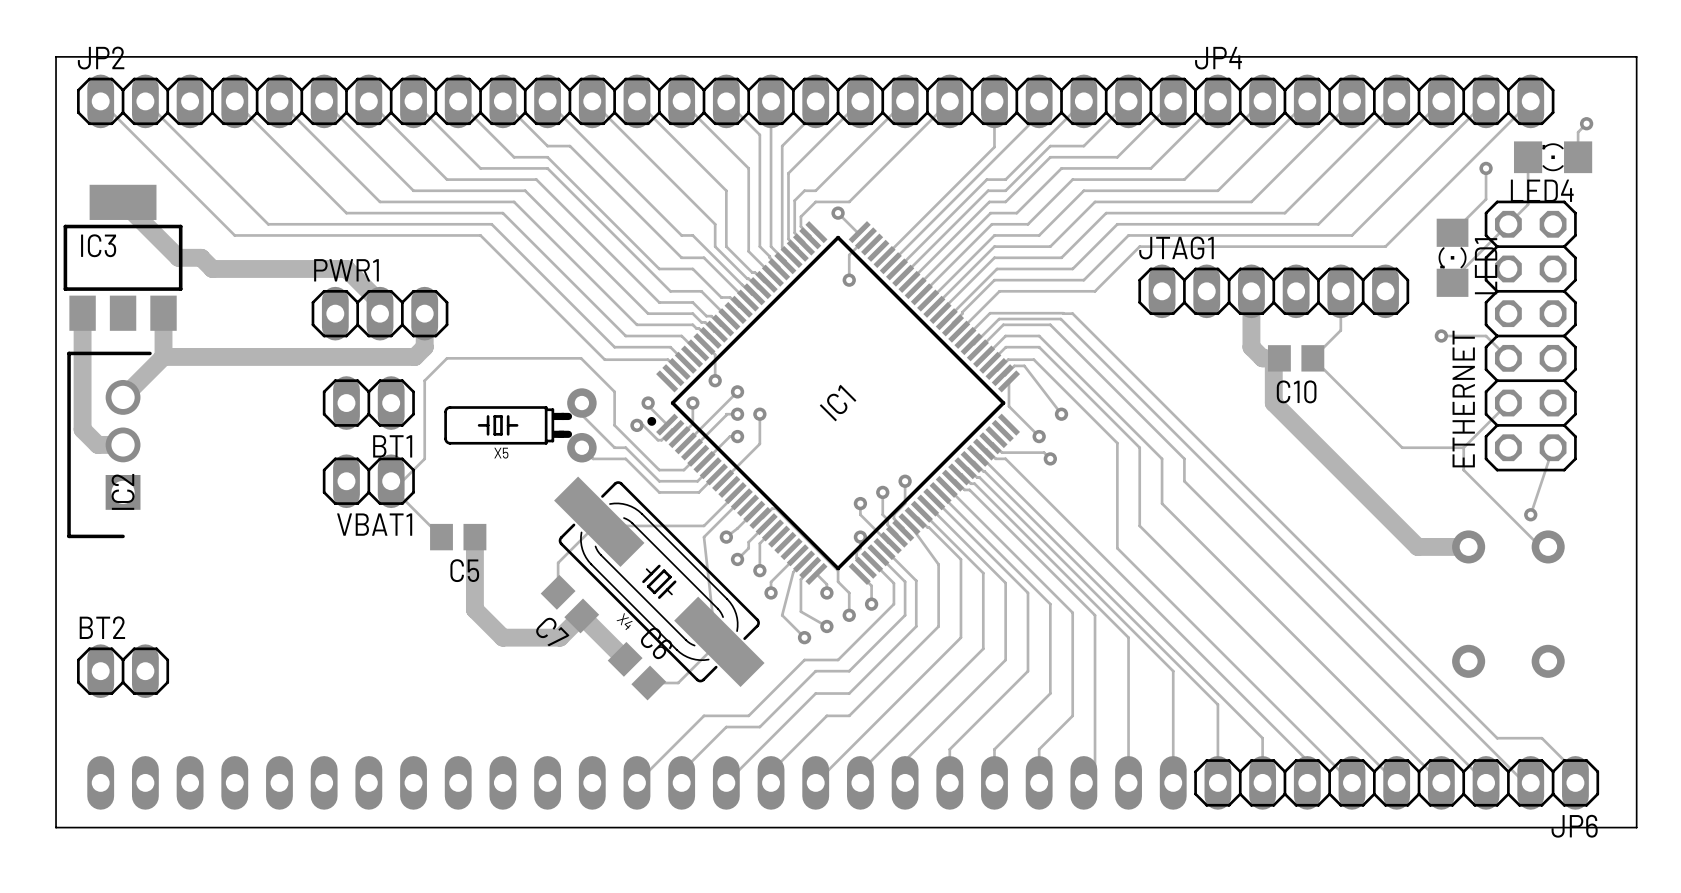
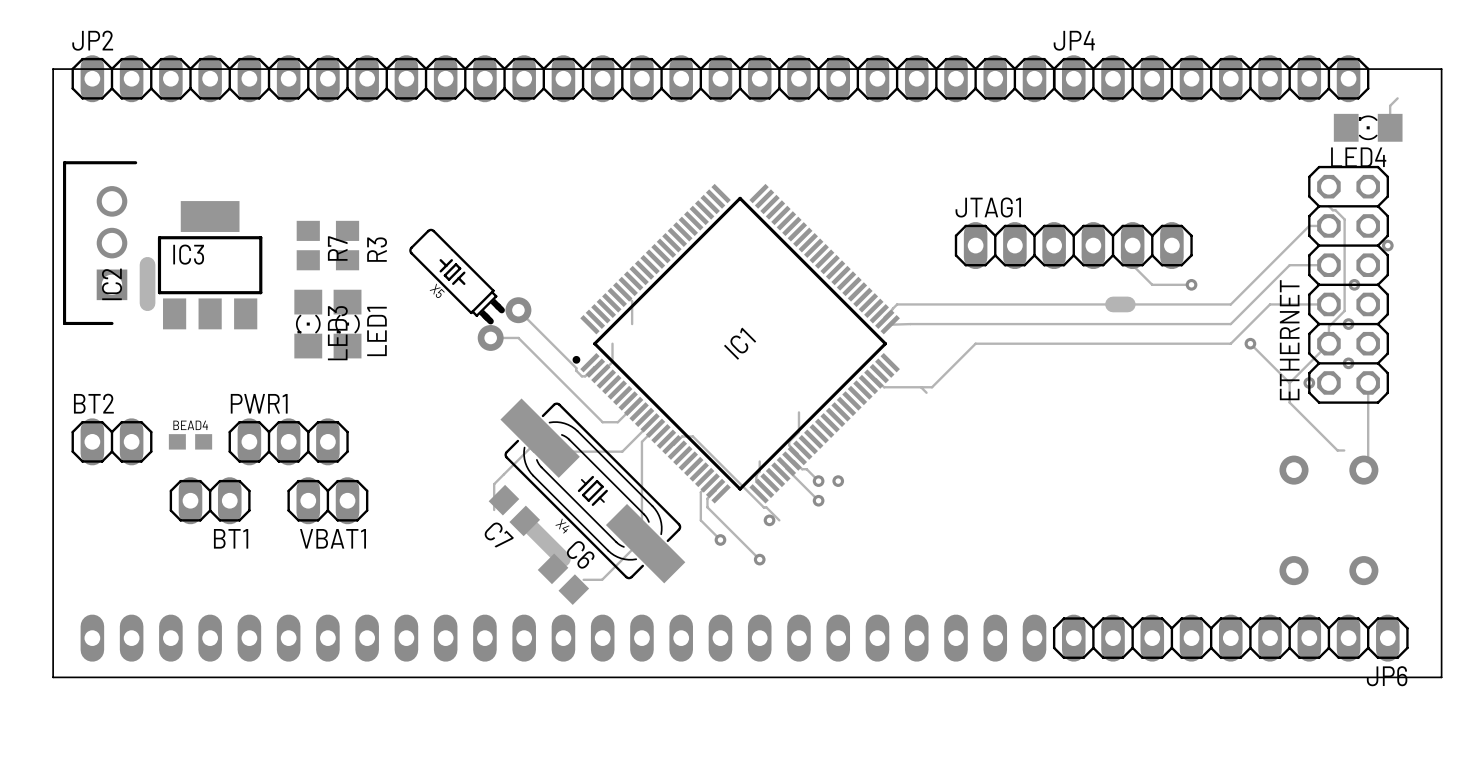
board edge: (56, 90) (56, 56) (1636, 56) (1636, 90) -> (53, 69) (1441, 69)
track: (100, 101) (234, 235) (480, 235) (604, 359) (667, 359) (679, 368) -> none
track: (145, 101) (268, 224) (491, 224) (614, 347) (670, 347) (685, 362) -> none
track: (234, 101) (346, 213) (502, 213) (625, 336) (681, 336) (698, 350) -> none
track: (279, 101) (380, 201) (514, 201) (636, 324) (692, 324) (710, 337) -> none
track: (324, 101) (413, 190) (525, 190) (648, 313) (692, 313) (701, 322) (705, 322) (716, 331) -> none
track: (368, 101) (447, 179) (536, 179) (659, 302) (692, 302) (706, 316) (711, 316) (723, 325) -> none
track: (413, 101) (480, 168) (547, 168) (670, 291) (701, 291) (729, 319) -> none
track: (458, 101) (514, 157) (547, 157) (659, 268) (692, 268) (721, 297) (730, 297) (741, 306) -> none
track: (502, 101) (547, 146) (569, 146) (681, 257) (704, 257) (748, 300) -> none
track: (547, 101) (681, 235) (692, 235) (751, 294) (754, 294) -> none
track: (592, 101) (715, 224) (715, 246) (747, 278) (760, 288) -> none
track: (636, 101) (726, 190) (726, 246) (752, 272) (766, 281) -> none
track: (681, 101) (748, 168) (748, 251) (772, 275) -> none
track: (726, 101) (759, 134) (759, 246) (779, 267) (779, 269) -> none
track: (771, 101) (771, 246) (785, 263) -> none
track: (815, 101) (815, 112) (782, 146) (782, 247) (791, 257) -> none
track: (860, 101) (788, 173) (788, 239) (797, 250) -> none
track: (905, 101) (815, 190) (804, 190) (794, 200) (794, 232) (804, 244) -> none
track: (949, 101) (849, 201) (815, 201) (800, 216) (800, 226) (810, 238) -> none
track: (994, 101) (994, 147) (884, 257) -> none
track: (1039, 101) (1039, 114) (890, 263) -> none
track: (1083, 101) (1005, 179) (986, 179) (897, 269) -> none
track: (1128, 101) (1083, 146) (1050, 146) (1005, 190) (988, 190) (903, 275) -> none
track: (1173, 101) (1117, 157) (1050, 157) (1005, 201) (989, 201) (909, 281) -> none
track: (1217, 101) (1150, 168) (1061, 168) (1016, 213) (990, 213) (915, 288) -> none
track: (1262, 101) (1184, 179) (1072, 179) (1027, 224) (991, 224) (921, 294) -> none
track: (1307, 101) (1217, 190) (1083, 190) (1039, 235) (994, 235) (928, 300) -> none
track: (1351, 101) (1251, 201) (1095, 201) (1050, 246) (994, 246) (934, 306) -> none
track: (1396, 101) (1284, 213) (1106, 213) (1061, 257) (994, 257) (940, 312) -> none
track: (1441, 101) (1318, 224) (1117, 224) (1072, 268) (997, 268) (946, 319) -> none
track: (1486, 101) (1351, 235) (1128, 235) (1083, 280) (994, 280) (962, 312) (953, 325) -> none
track: (1530, 101) (1385, 246) (1139, 246) (1095, 291) (999, 291) (959, 331) -> none
via: (1586, 123) -> none
track: (1528, 157) (1528, 204) (1452, 280) (1452, 282) -> none
track: (1486, 168) (1486, 199) (1452, 232) -> none
via: (1486, 168) -> none
track: (123, 202) (178, 257) (201, 257) (212, 268) (346, 268) (380, 302) (380, 313) -> none
track: (838, 213) (857, 232) (859, 232) -> none
via: (838, 213) -> none
track: (865, 238) (849, 255) (849, 280) -> none
track: none -> (1328, 206) (1344, 219) (1344, 310) (1328, 326) (1328, 343)
IC3 position: (123, 257) -> (210, 265)
LED1 position: (1452, 257) -> (347, 324)
via: (849, 280) -> none
R7: none -> (308, 245)
R3: none -> (347, 245)
track: (1251, 291) (1251, 347) (1262, 358) -> none
JTAG1 position: (1273, 291) -> (1073, 245)
track: none -> (1132, 245) (1132, 265) (1152, 284) (1191, 284)
track: (1340, 291) (1340, 330) (1312, 358) (1402, 447) (1463, 447) -> (1250, 343) (1289, 382)
via: none -> (1387, 245)
track: (82, 313) (82, 429) (97, 444) (123, 444) -> none
PWR1 position: (380, 313) -> (288, 441)
track: (424, 313) (424, 347) (414, 356) (163, 356) (123, 397) -> none
via: none -> (1191, 284)
track: (1441, 336) (1486, 336) (1508, 358) -> (921, 387) (932, 387) (975, 343) (1230, 343) (1270, 304) (1328, 304)
via: (1441, 336) -> none
via: none -> (1354, 284)
track: (965, 337) (990, 313) (1072, 313) (1497, 738) (1541, 738) (1575, 771) (1575, 782) -> none
track: (971, 344) (974, 344) (999, 319) (1060, 319) (1524, 782) (1530, 782) -> none
track: (977, 350) (1003, 324) (1050, 324) (1184, 458) (1184, 481) (1486, 782) -> none
track: (984, 356) (1005, 336) (1039, 336) (1162, 458) (1162, 503) (1441, 782) -> none
track: (1279, 358) (1273, 363) (1273, 403) (1417, 546) (1468, 546) -> (1127, 304) (1230, 304) (1309, 225) (1328, 225)
C10: (1296, 358) -> none
track: (990, 362) (1005, 347) (1039, 347) (1139, 447) (1139, 525) (1396, 782) -> none
track: (996, 368) (997, 370) (1008, 359) (1033, 359) (1117, 443) (1117, 548) (1351, 782) -> none
track: (1002, 375) (1014, 365) (1024, 365) (1061, 414) -> (884, 319) (897, 304) (1113, 304)
LED3: none -> (308, 324)
via: (715, 380) -> none
via: none -> (1348, 324)
track: (1008, 381) (1008, 406) (1039, 436) -> (890, 324) (1230, 324) (1289, 265) (1328, 265)
track: (737, 391) (686, 443) -> none
via: (737, 391) -> none
BT1 position: (368, 403) -> (210, 500)
track: (581, 403) (581, 415) (614, 447) (625, 447) (659, 481) (697, 481) (710, 468) -> none
track: (648, 403) (648, 405) (667, 424) -> none
via: (648, 403) -> none
via: (692, 403) -> none
via: none -> (1250, 343)
track: (737, 414) (726, 414) (692, 449) -> none
via: (737, 414) -> none
track: (759, 414) (759, 443) (723, 480) -> none
via: (759, 414) -> none
via: (1061, 414) -> none
X5 rotation: 0° (520, 425) -> 45° clockwise (470, 289)
track: (614, 425) (614, 391) (581, 358) (447, 358) (424, 380) (424, 458) (402, 481) (391, 481) (391, 486) (441, 537) -> (543, 363) (518, 337) (490, 337)
track: (636, 425) (643, 425) (651, 433) -> (518, 310) (576, 368) (576, 370)
via: (636, 425) -> none
via: none -> (1348, 363)
track: (737, 436) (729, 436) (704, 461) -> none
via: (737, 436) -> none
via: (1039, 436) -> none
IC2 position: (109, 444) -> (100, 243)
track: (581, 447) (593, 458) (625, 458) (659, 492) (681, 492) -> none
via: none -> (1309, 382)
track: (1553, 447) (1530, 514) -> (1368, 382) (1368, 481)
track: (984, 449) (995, 458) (1005, 458) (1307, 760) (1307, 782) -> none
track: (698, 455) (683, 470) (659, 470) -> (602, 422) (583, 402)
track: (977, 455) (980, 455) (1262, 738) (1262, 782) -> none
via: (1050, 458) -> none
track: (971, 461) (984, 471) (1217, 704) (1217, 782) -> none
track: (965, 468) (979, 477) (1173, 671) (1173, 782) -> none
track: (959, 474) (970, 483) (974, 483) (1128, 637) (1128, 782) -> none
track: (953, 480) (964, 489) (969, 489) (1095, 615) (1095, 771) (1083, 782) -> none
VBAT1 position: (368, 481) -> (327, 500)
via: (905, 481) -> none
track: (946, 486) (1072, 612) (1072, 715) (1039, 749) (1039, 782) -> none
track: (882, 492) (882, 514) (897, 536) -> (818, 481) (806, 469) (802, 469) (791, 461)
via: (882, 492) -> none
track: (940, 493) (1050, 604) (1050, 693) (994, 749) (994, 782) -> none
track: (934, 499) (1027, 592) (1027, 671) (949, 749) (949, 782) -> none
track: (860, 503) (860, 514) (888, 542) (890, 542) -> (818, 500) (786, 466)
via: (860, 503) -> none
track: (928, 505) (1005, 583) (1005, 660) (905, 760) (905, 782) -> none
track: (776, 508) (838, 570) (838, 581) (849, 592) (849, 615) -> (685, 436) (692, 436) (763, 507) (766, 507) (779, 520)
track: (754, 511) (726, 537) -> none
track: (921, 511) (983, 573) (983, 648) (860, 771) (860, 782) -> none
BEAD4: none -> (190, 441)
track: (726, 514) (704, 537) (715, 637) (719, 641) (678, 682) (648, 682) -> (641, 441) (641, 539)
via: (1530, 514) -> none
track: (915, 517) (928, 527) (960, 559) (960, 637) (815, 782) -> none
track: (766, 524) (748, 542) (748, 548) (737, 559) -> none
track: (909, 524) (938, 564) (938, 626) (849, 715) (826, 715) (771, 771) (771, 782) -> none
track: (1518, 524) (1540, 546) (1548, 546) -> (1337, 450) (1344, 450)
track: (772, 530) (759, 543) (759, 570) -> none
C5: (458, 537) -> none
track: (474, 537) (474, 609) (502, 637) (560, 637) (581, 615) (625, 659) -> none
via: (726, 537) -> none
via: (860, 537) -> none
track: (884, 549) (916, 580) (916, 626) (849, 693) (815, 693) (726, 782) -> none
track: (797, 555) (771, 582) (771, 592) -> none
via: (737, 559) -> none
track: (882, 559) (905, 581) (905, 615) (849, 671) (815, 671) (759, 727) (726, 727) (681, 771) (681, 782) -> none
via: none -> (818, 481)
via: none -> (838, 481)
track: (872, 561) (893, 583) (893, 604) (838, 660) (804, 660) (748, 715) (704, 715) (636, 782) -> none
via: (759, 570) -> none
track: (793, 572) (782, 615) (804, 637) -> (700, 492) (700, 520) (720, 539)
track: (816, 573) (826, 584) (826, 592) -> none
track: (859, 573) (871, 585) (871, 604) -> none
X4 position: (659, 581) -> (592, 490)
via: none -> (818, 500)
track: (800, 589) (800, 611) (826, 626) -> (707, 507) (759, 559)
via: (771, 592) -> none
via: (826, 592) -> none
C7 position: (569, 604) -> (514, 510)
track: none -> (524, 520) (562, 559)
via: (849, 615) -> none
track: none -> (641, 539) (602, 579) (583, 579)
via: none -> (720, 539)
via: (826, 626) -> none
via: (804, 637) -> none
via: none -> (759, 559)
BT2 position: (123, 671) -> (111, 441)
board edge: (56, 782) (56, 827) (1636, 827) (1636, 782) -> (53, 677) (1441, 677)
part position: (636, 782) -> (563, 638)
JP6 position: (1396, 782) -> (1230, 638)

